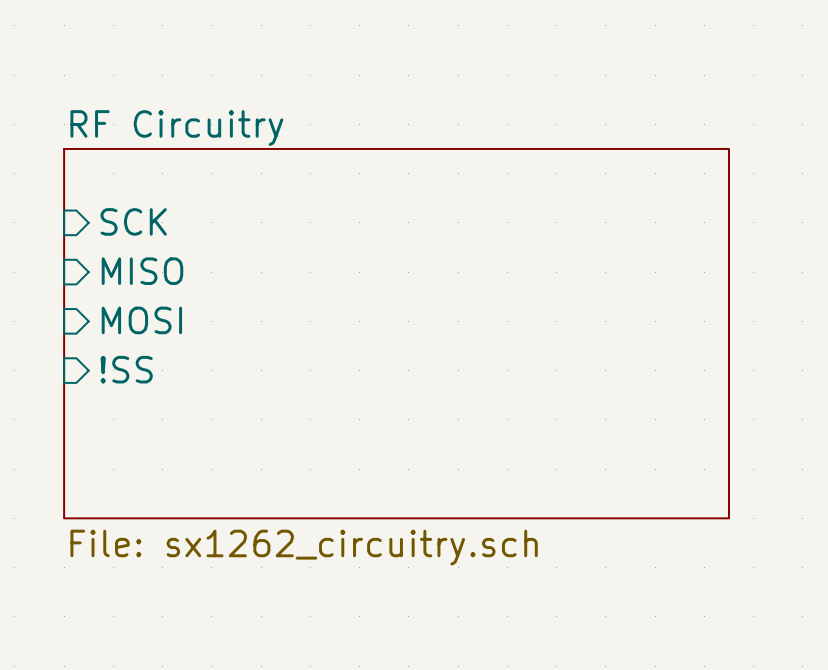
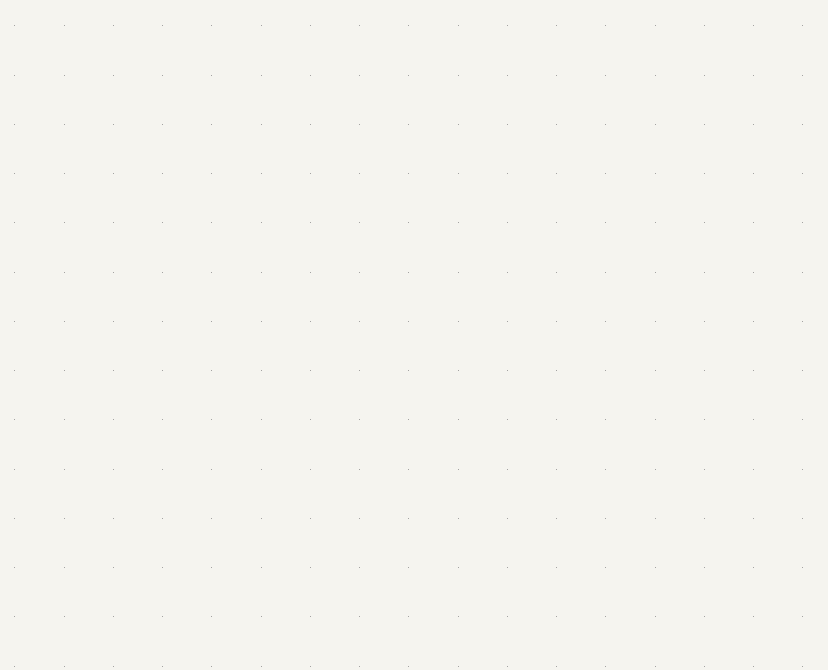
sheet pin: SCK (133, 221) -> none
sheet pin: MISO (142, 271) -> none
sheet pin: MOSI (141, 320) -> none
sheet RF Circuitry: File: sx1262_circuitry.sch (396, 333) -> none
sheet pin: !SS (126, 369) -> none

